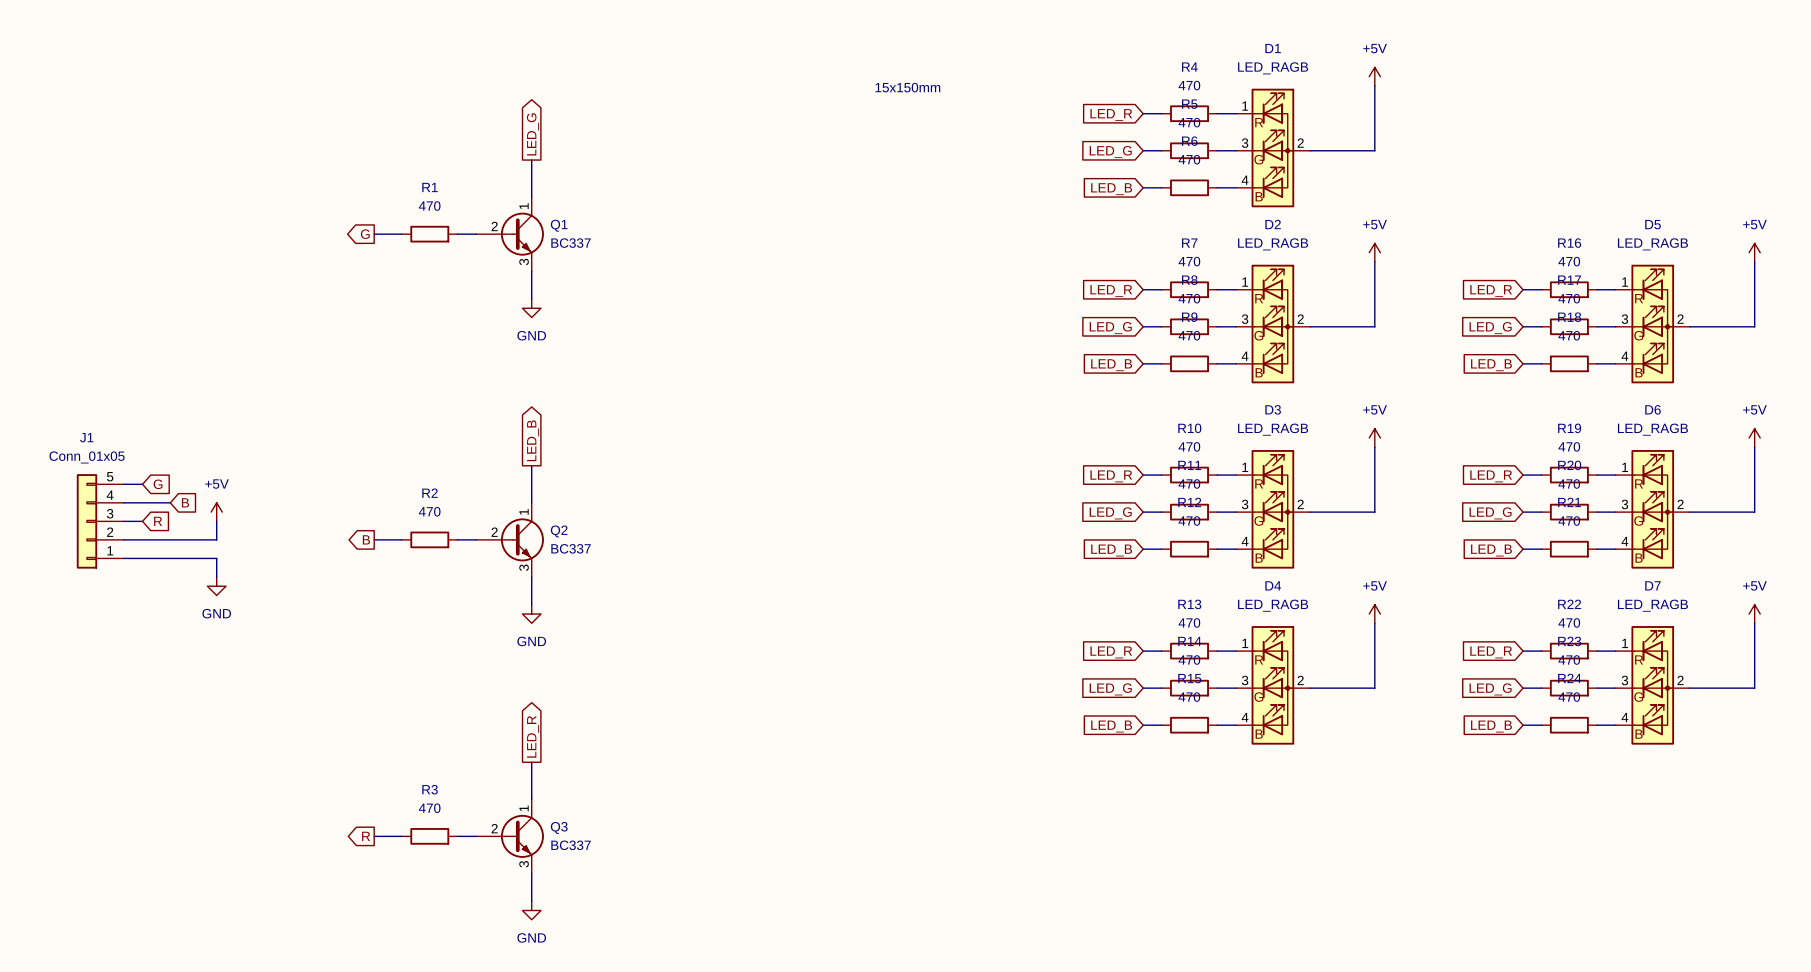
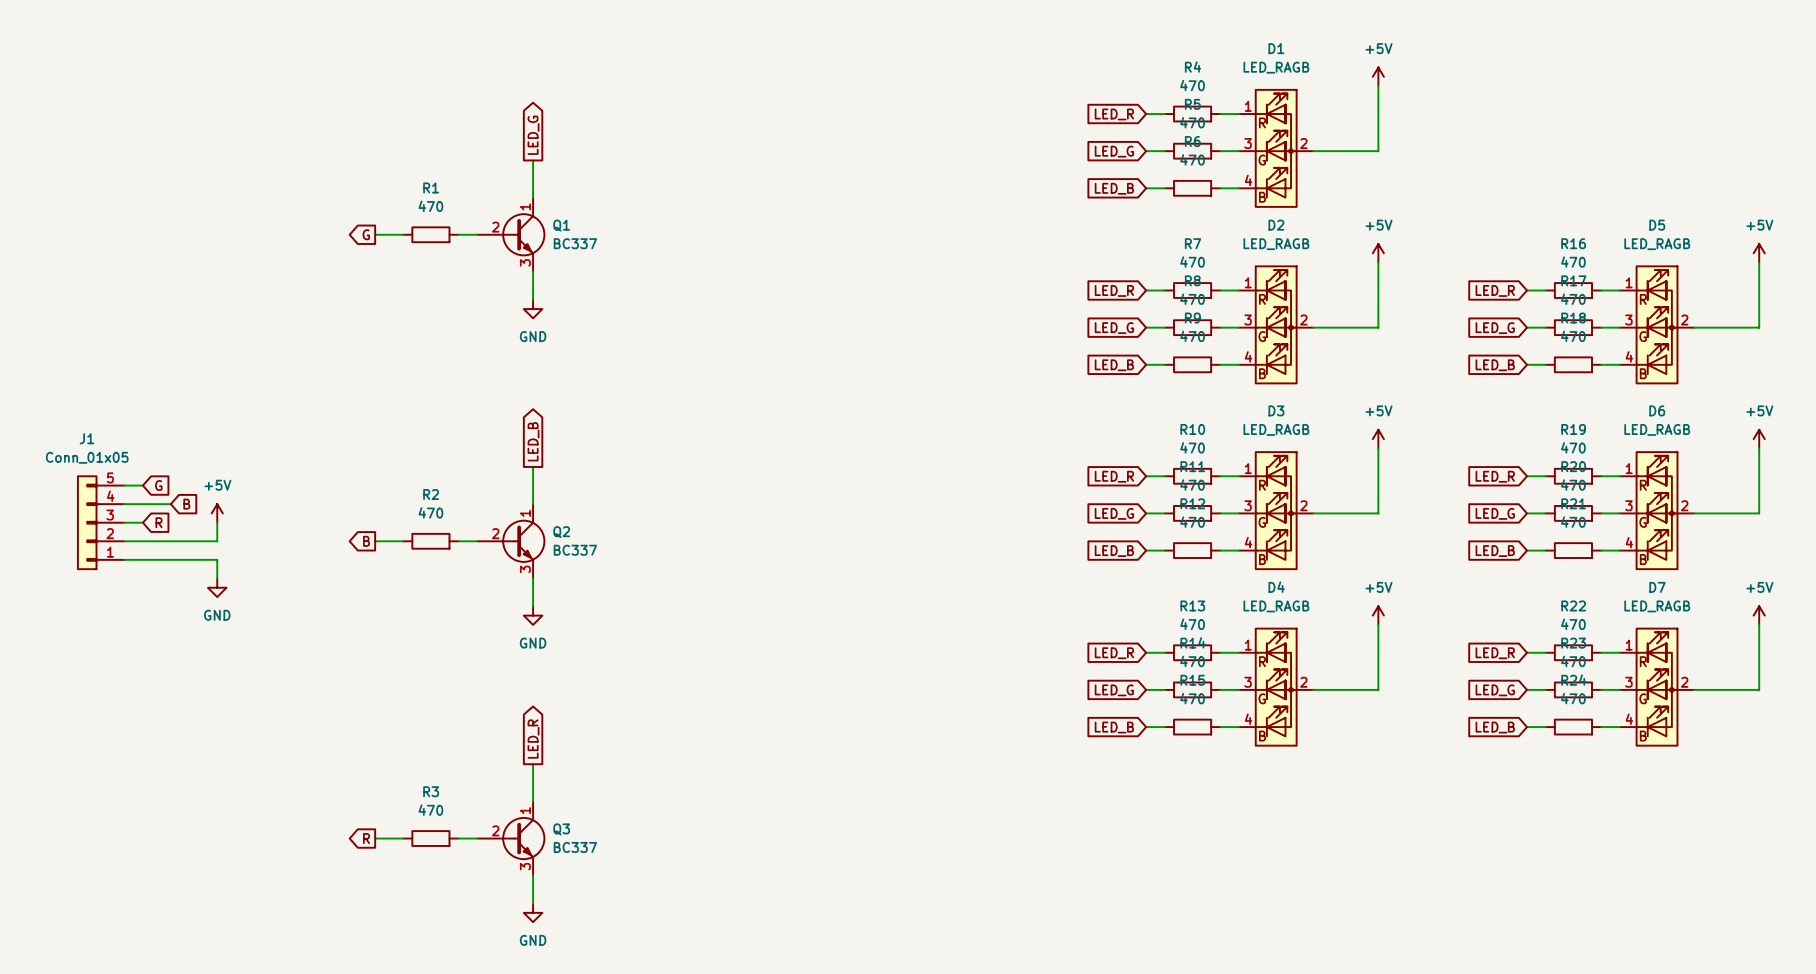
text: 15x150mm (907, 87) -> none

